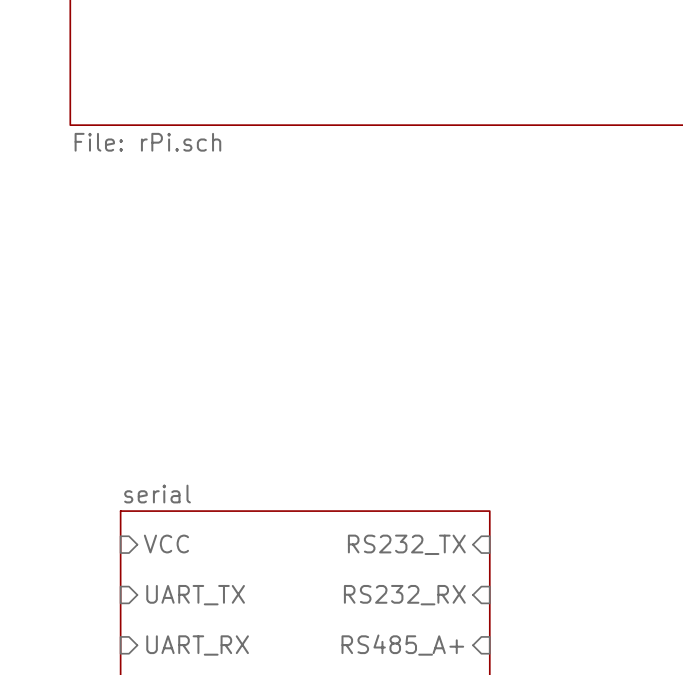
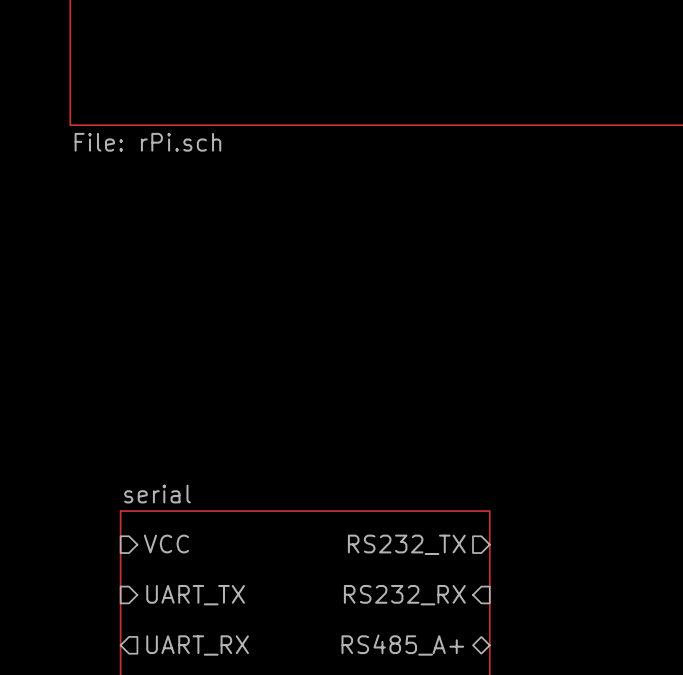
sheet pin shape: input (406, 544) -> output (406, 544)
sheet pin shape: input (197, 645) -> output (197, 645)
sheet pin shape: input (402, 645) -> bidirectional (402, 645)

